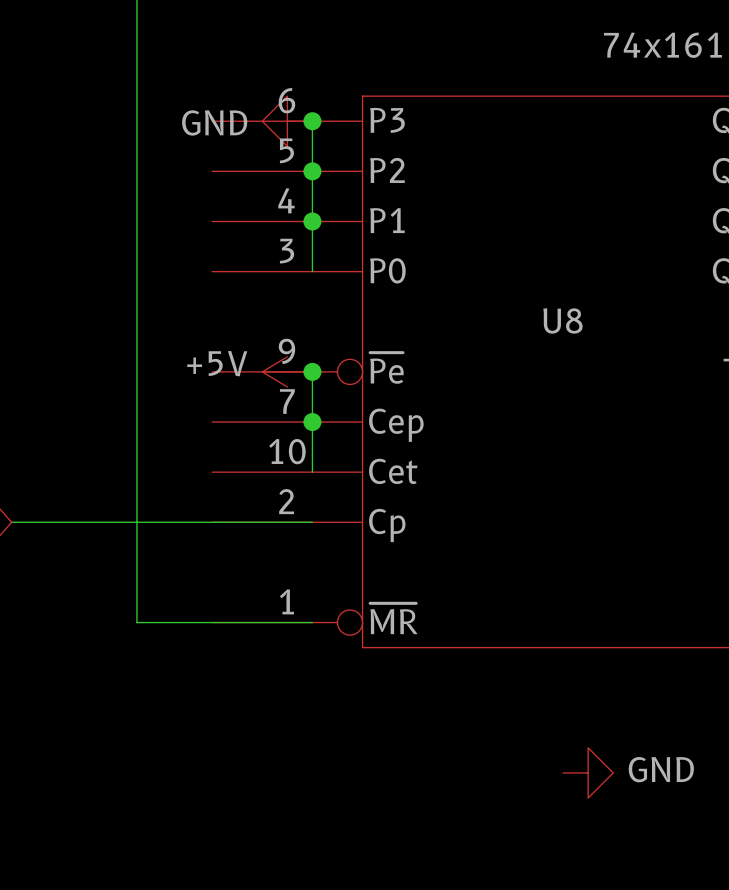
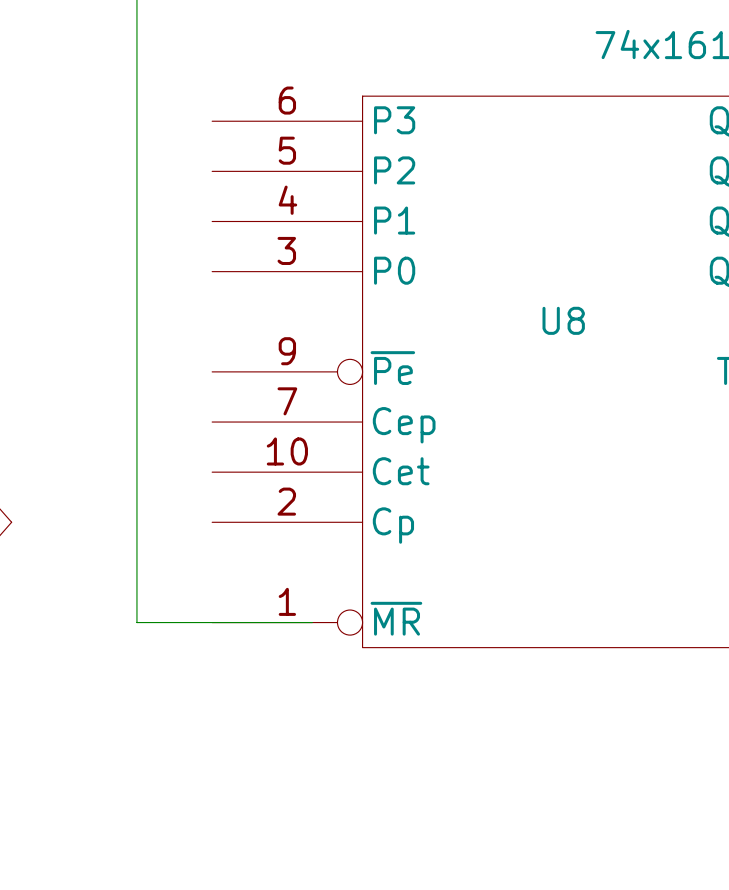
power symbol: GND (287, 121) -> none
wire: (312, 121) (312, 271) -> none
junction: (312, 121) -> none
junction: (312, 171) -> none
junction: (312, 221) -> none
power symbol: +5V (287, 371) -> none
wire: (312, 371) (312, 472) -> none
junction: (312, 371) -> none
junction: (312, 422) -> none
wire: (11, 522) (312, 522) -> none
power symbol: GND (588, 772) -> none

